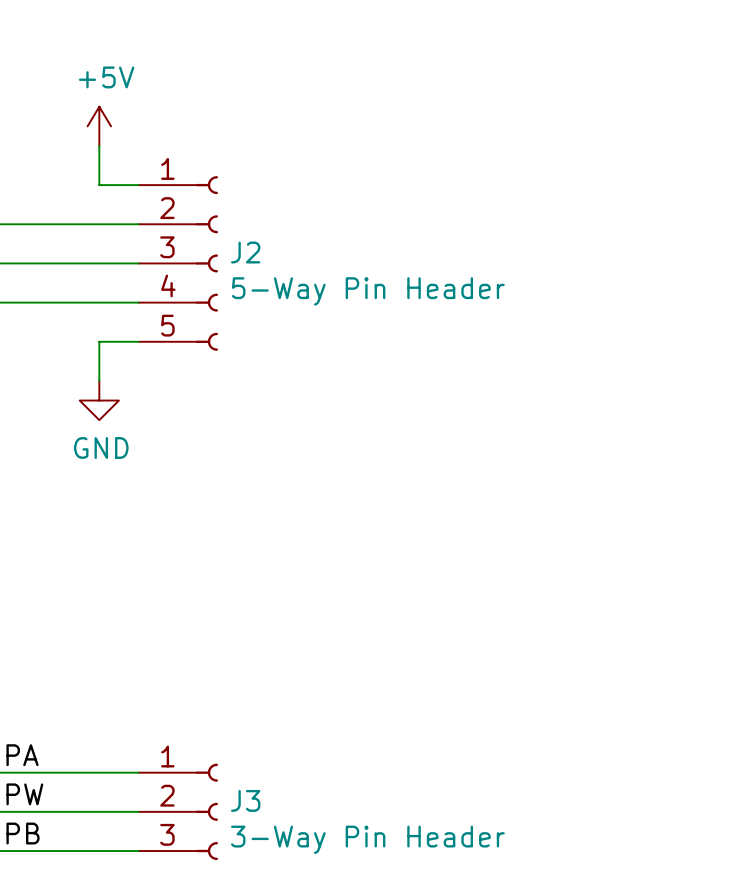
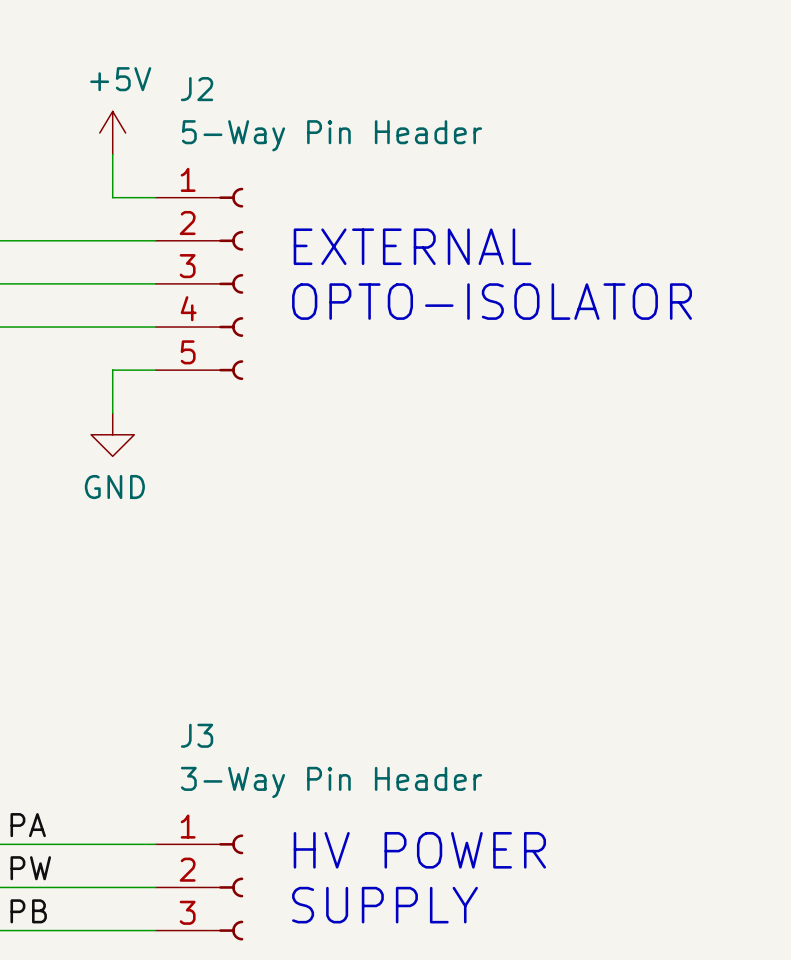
text: none -> EXTERNAL (412, 246)
J2 name position: J2 (245, 252) -> J2 (197, 89)
text: none -> OPTO-ISOLATOR (492, 301)
J2 value position: 5-Way Pin Header (368, 291) -> 5-Way Pin Header (332, 135)
text: none -> HV POWER (419, 850)
J3 name position: J3 (245, 800) -> J3 (197, 735)
text: none -> SUPPLY (384, 905)
J3 value position: 3-Way Pin Header (367, 839) -> 3-Way Pin Header (331, 782)

